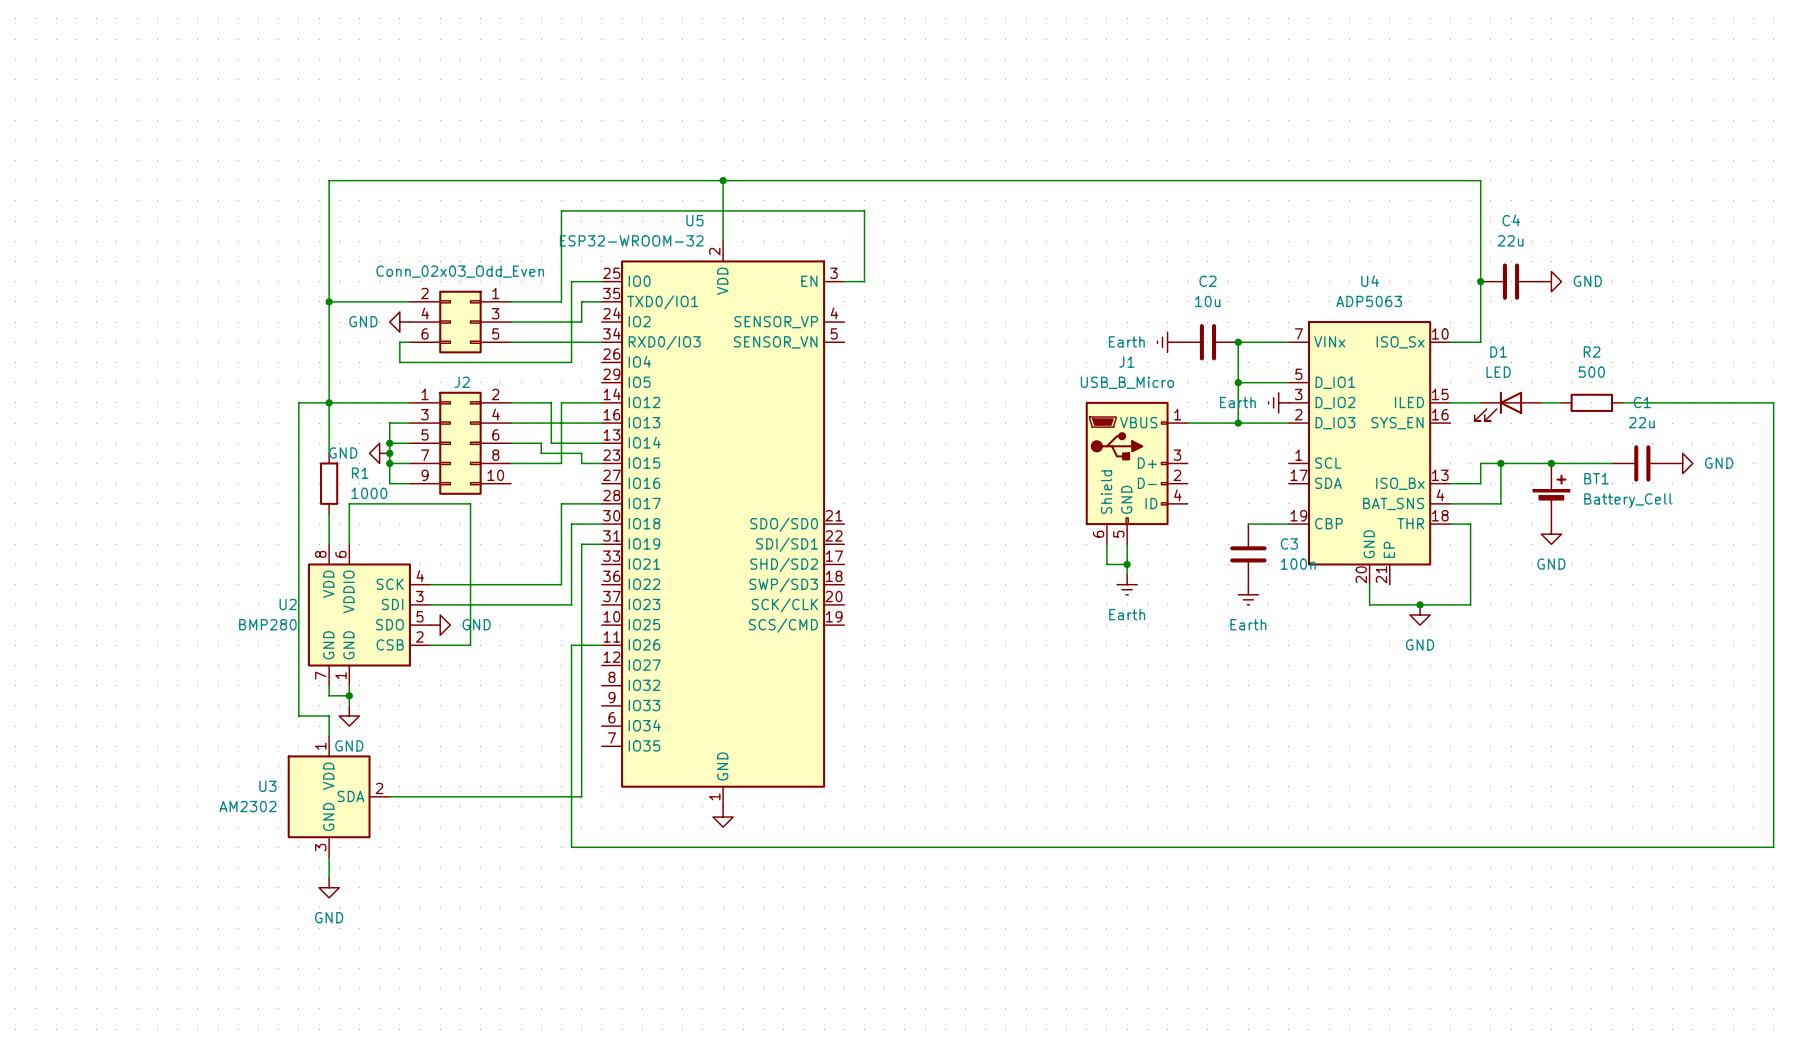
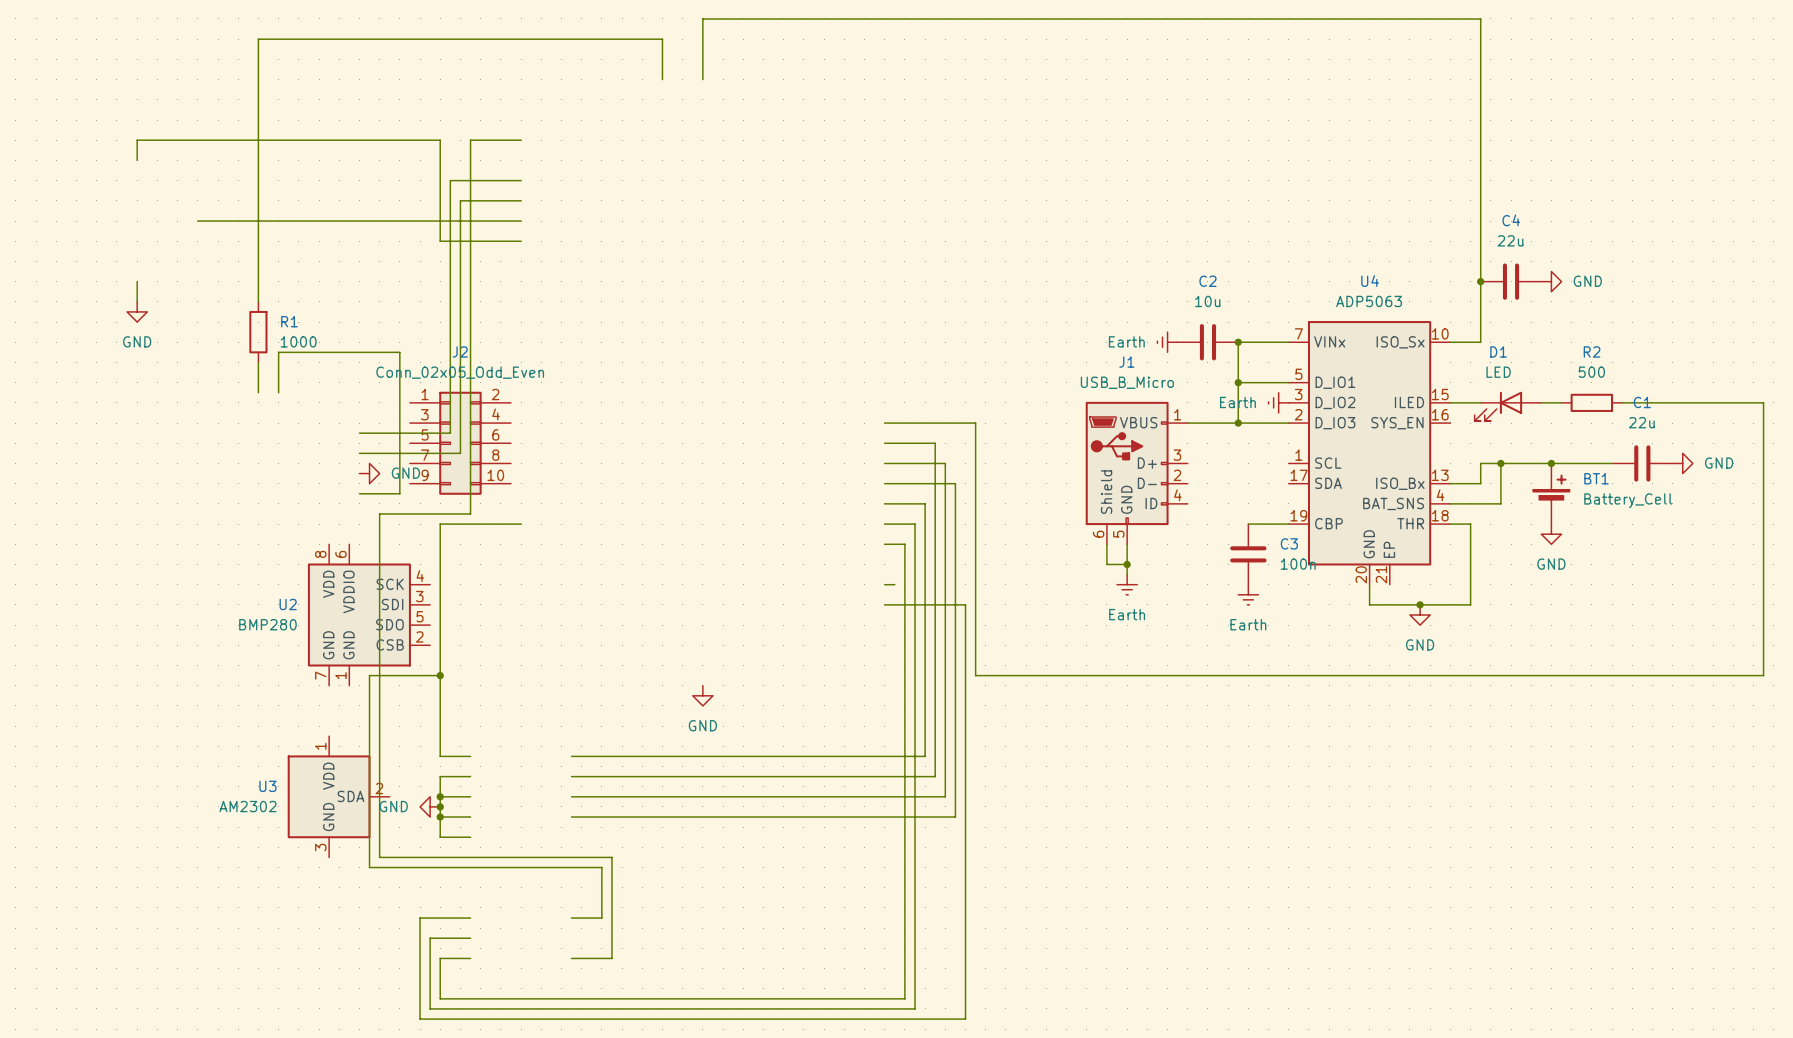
wire: none -> (662, 79) (662, 39) (258, 39) (258, 301)
wire: none -> (137, 160) (137, 140) (440, 140) (440, 241) (521, 241)
wire: (450, 180) (329, 180) (329, 453) -> (450, 180) (450, 433) (359, 433)
wire: (521, 180) (1480, 180) -> (702, 79) (702, 18) (1480, 18) (1480, 180)
wire: (723, 180) (723, 241) -> none
junction: (723, 180) -> none
wire: none -> (521, 200) (460, 200) (460, 453) (359, 453)
wire: none -> (197, 221) (521, 221)
wire: none -> (137, 281) (137, 301)
wire: (601, 281) (571, 281) (571, 362) (399, 362) -> (359, 493) (399, 493) (399, 362)
wire: (844, 281) (864, 281) (864, 210) (561, 210) (561, 301) (510, 301) -> none
wire: (329, 301) (409, 301) -> none
junction: (329, 301) -> none
wire: (601, 301) (581, 301) (581, 322) (510, 322) -> none
power symbol: none -> GND (137, 311)
power symbol: GND (399, 322) -> none
part: Conn_02x03_Odd_Even (460, 322) -> none
wire: (409, 342) (399, 342) (399, 352) -> (278, 392) (278, 352) (399, 352)
wire: (510, 342) (601, 342) -> none
J2 value: none -> Conn_02x05_Odd_Even (460, 372)
J2 name position: J2 (462, 382) -> J2 (460, 351)
junction: (329, 402) -> none
wire: (409, 402) (298, 402) (298, 716) (329, 716) (329, 736) -> none
wire: (510, 402) (551, 402) (551, 443) (601, 443) -> none
wire: (601, 402) (561, 402) (561, 463) (510, 463) -> none
wire: (1763, 402) (1773, 402) (1773, 847) (571, 847) (571, 645) (601, 645) -> (1763, 402) (1763, 675) (975, 675) (975, 423) (884, 423)
wire: (409, 423) (389, 423) (389, 483) (409, 483) -> none
wire: (510, 423) (601, 423) -> none
wire: (389, 443) (409, 443) -> none
junction: (389, 443) -> none
wire: (510, 443) (541, 443) (541, 453) (581, 453) (581, 463) (601, 463) -> none
wire: none -> (884, 443) (935, 443) (935, 776) (571, 776)
power symbol rotation: 0° (379, 453) -> 180° (369, 473)
power symbol position: GND (379, 453) -> GND (369, 473)
junction: (389, 453) -> none
wire: (389, 463) (409, 463) -> none
junction: (389, 463) -> none
R1 position: (329, 483) -> (258, 332)
wire: none -> (884, 483) (955, 483) (955, 817) (571, 817)
wire: (470, 503) (349, 503) (349, 544) -> (470, 503) (470, 140) (521, 140)
wire: (601, 503) (561, 503) (561, 584) (430, 584) -> none
wire: none -> (884, 503) (925, 503) (925, 756) (571, 756)
wire: (329, 513) (329, 544) -> (258, 362) (258, 392)
wire: (470, 513) (470, 645) (430, 645) -> (470, 513) (379, 513) (379, 857) (611, 857) (611, 958) (571, 958)
wire: none -> (521, 524) (440, 524) (440, 756) (470, 756)
wire: (601, 524) (571, 524) (571, 604) (430, 604) -> none
U5: ESP32-WROOM-32 (723, 524) -> none
wire: none -> (884, 524) (915, 524) (915, 1008) (430, 1008) (430, 938) (470, 938)
wire: (601, 544) (581, 544) (581, 796) -> (884, 463) (945, 463) (945, 796) (581, 796)
wire: none -> (884, 544) (904, 544) (904, 998) (440, 998) (440, 958) (470, 958)
wire: none -> (884, 584) (894, 584)
wire: none -> (884, 604) (965, 604) (965, 1019) (420, 1019) (420, 918) (470, 918)
power symbol: GND (440, 625) -> none
wire: none -> (440, 675) (369, 675) (369, 867) (601, 867) (601, 918) (571, 918)
junction: none -> (440, 675)
wire: (329, 685) (329, 695) (349, 695) -> none
wire: (349, 685) (349, 705) -> none
junction: (349, 695) -> none
power symbol: none -> GND (702, 695)
power symbol: GND (349, 716) -> none
wire: none -> (470, 776) (440, 776) (440, 837) (470, 837)
wire: (389, 796) (440, 796) -> none
junction: none -> (440, 796)
wire: (470, 796) (571, 796) -> none
power symbol: none -> GND (430, 806)
junction: none -> (440, 806)
wire: none -> (440, 817) (470, 817)
junction: none -> (440, 817)
power symbol: (723, 817) -> none
wire: (329, 857) (329, 877) -> none
power symbol: GND (329, 887) -> none

